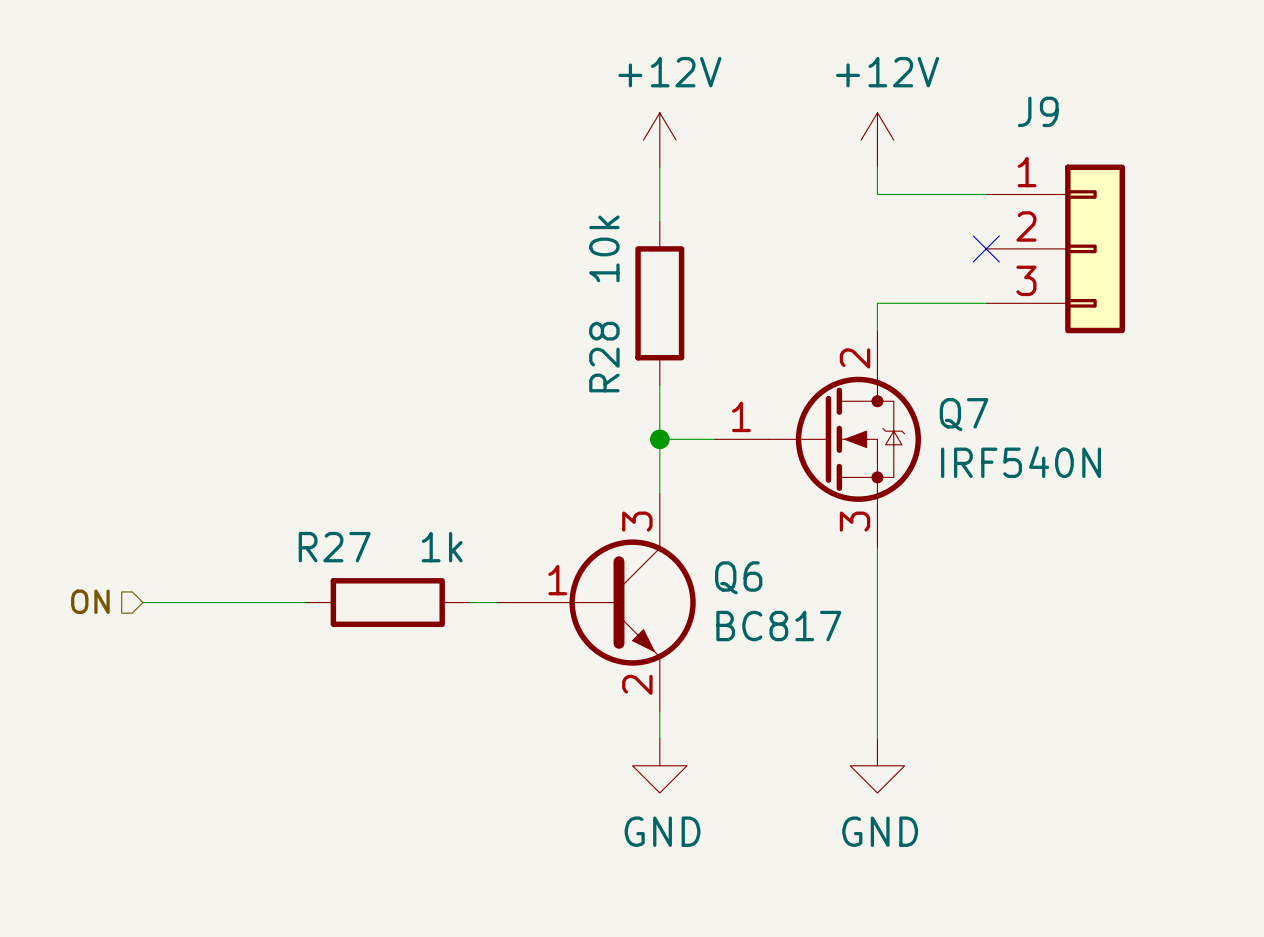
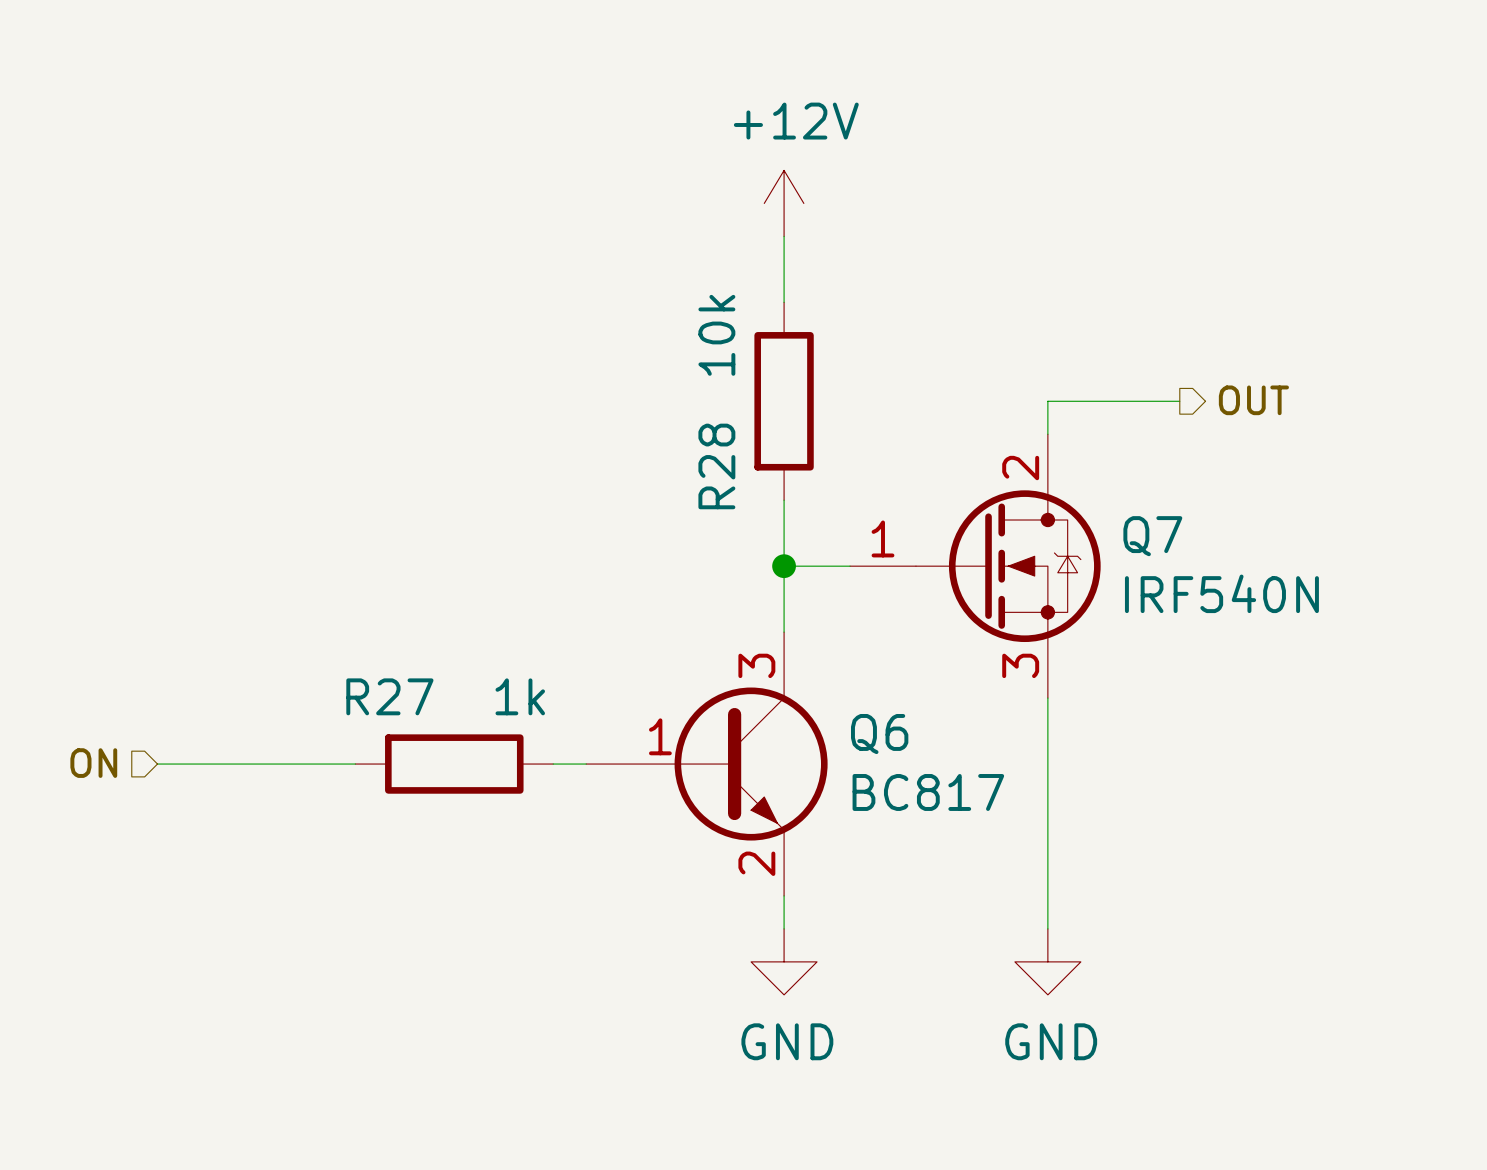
power symbol: +12V (877, 140) -> none
wire: (877, 167) (877, 194) (986, 194) -> none
no-connect mark: (986, 248) -> none
J9: (1055, 248) -> none
hierarchical label: none -> OUT (1253, 400)

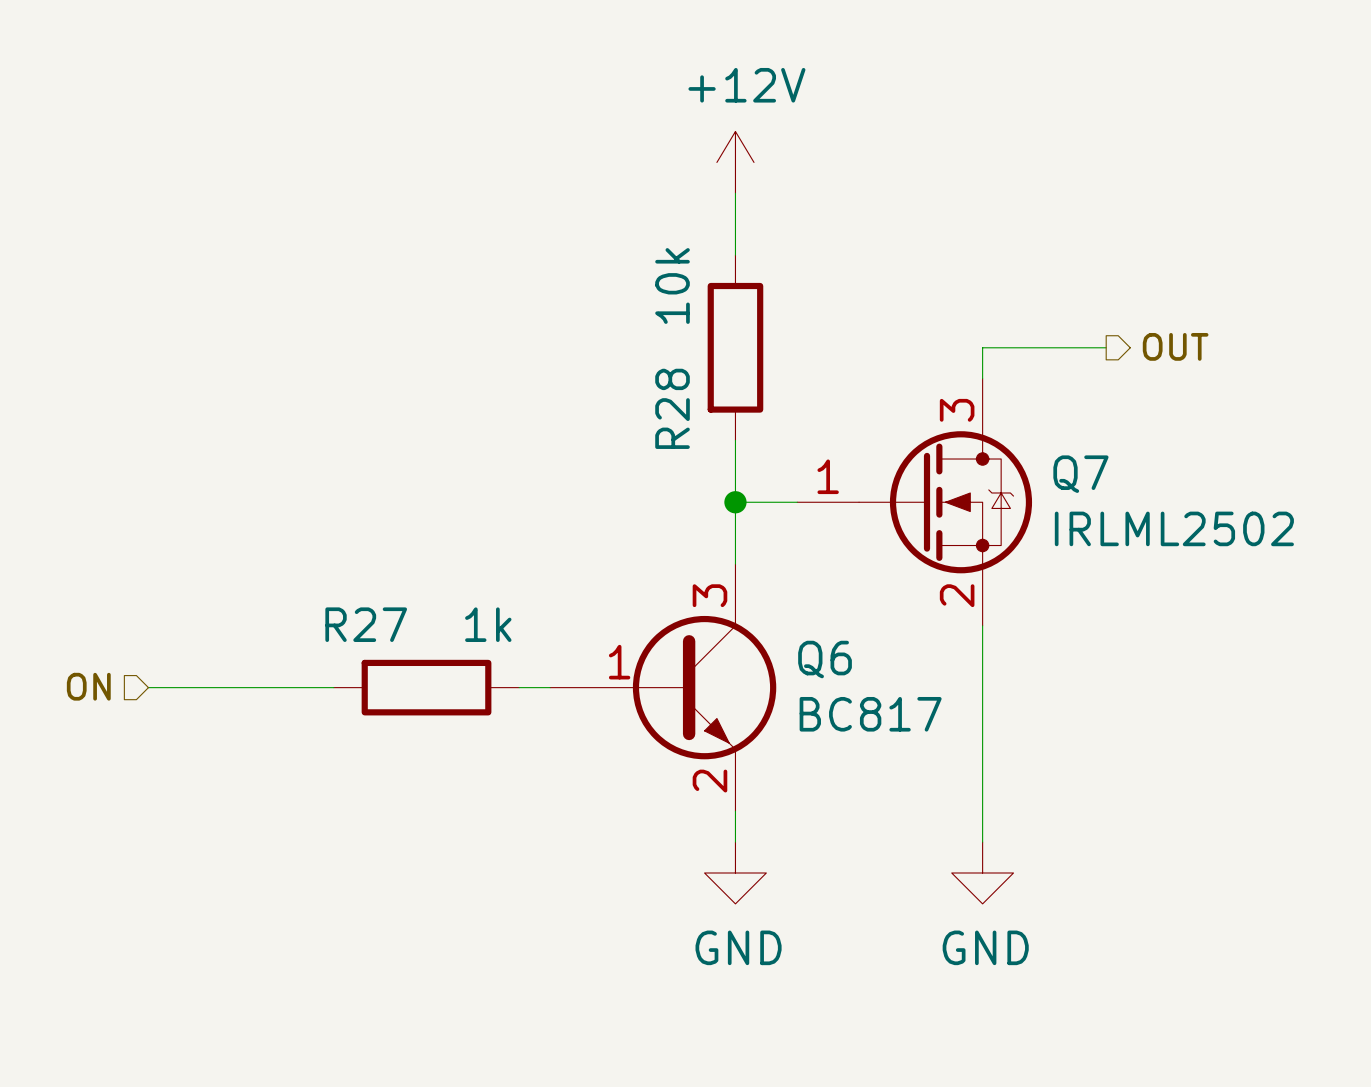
Q7 pin number: 2 (1020, 468) -> 3 (957, 410)
Q7 value: IRF540N (1221, 593) -> IRLML2502 (1174, 528)
Q7 pin number: 3 (1020, 665) -> 2 (957, 595)

